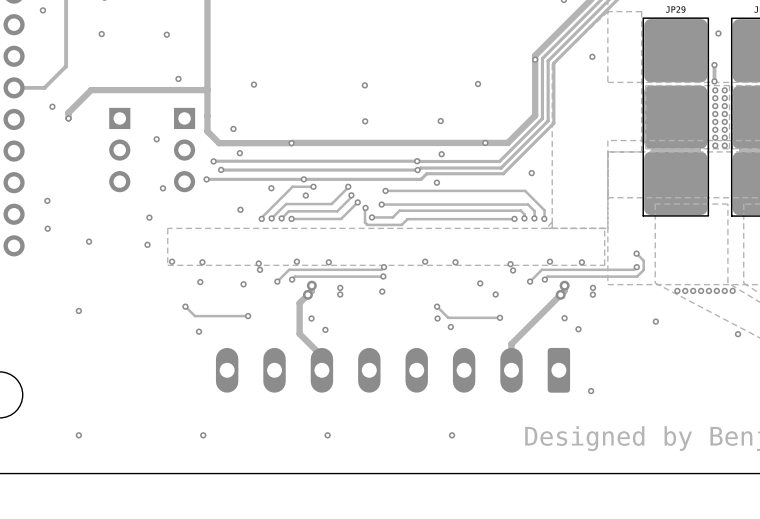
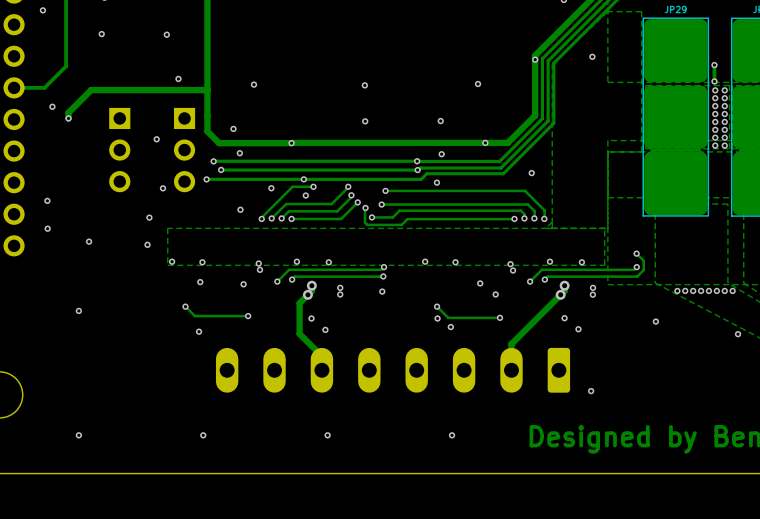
via: (718, 33) -> none

